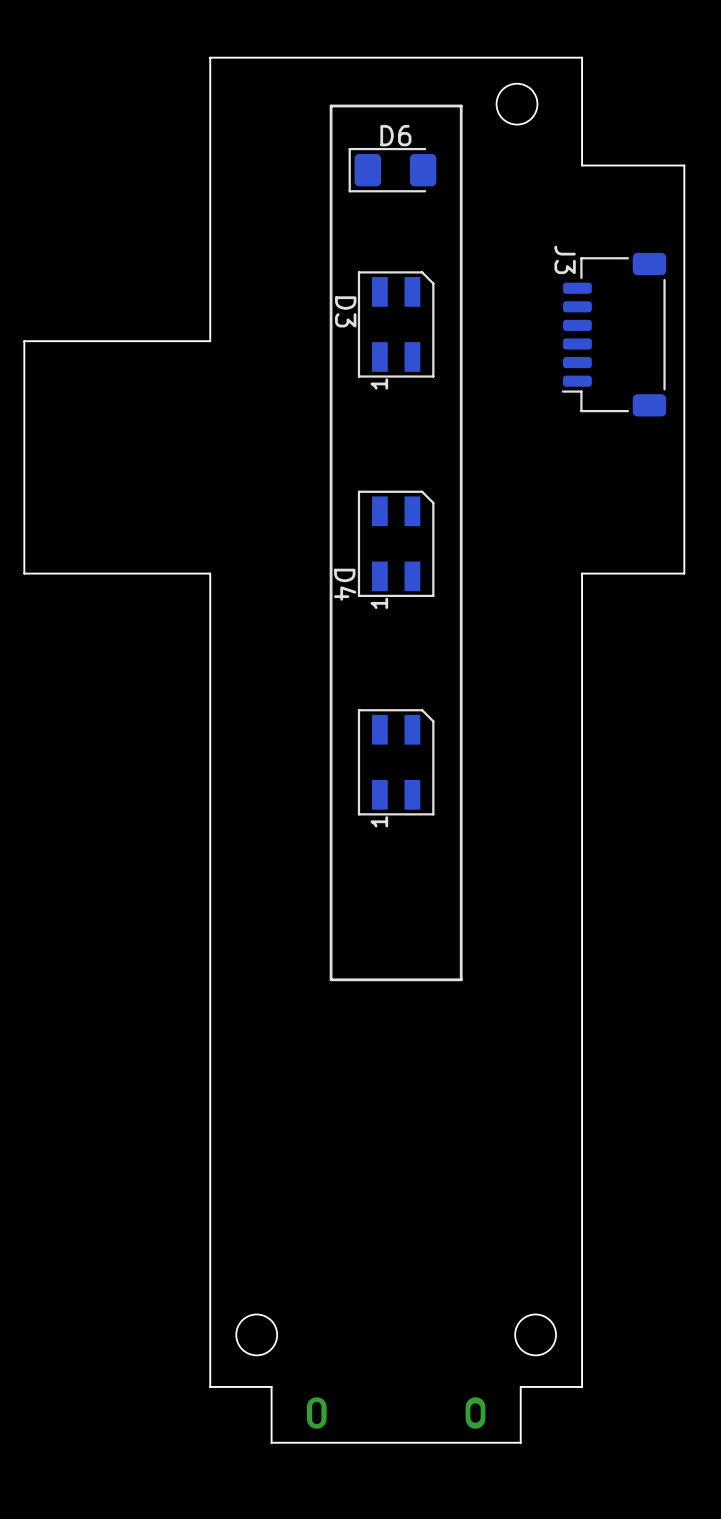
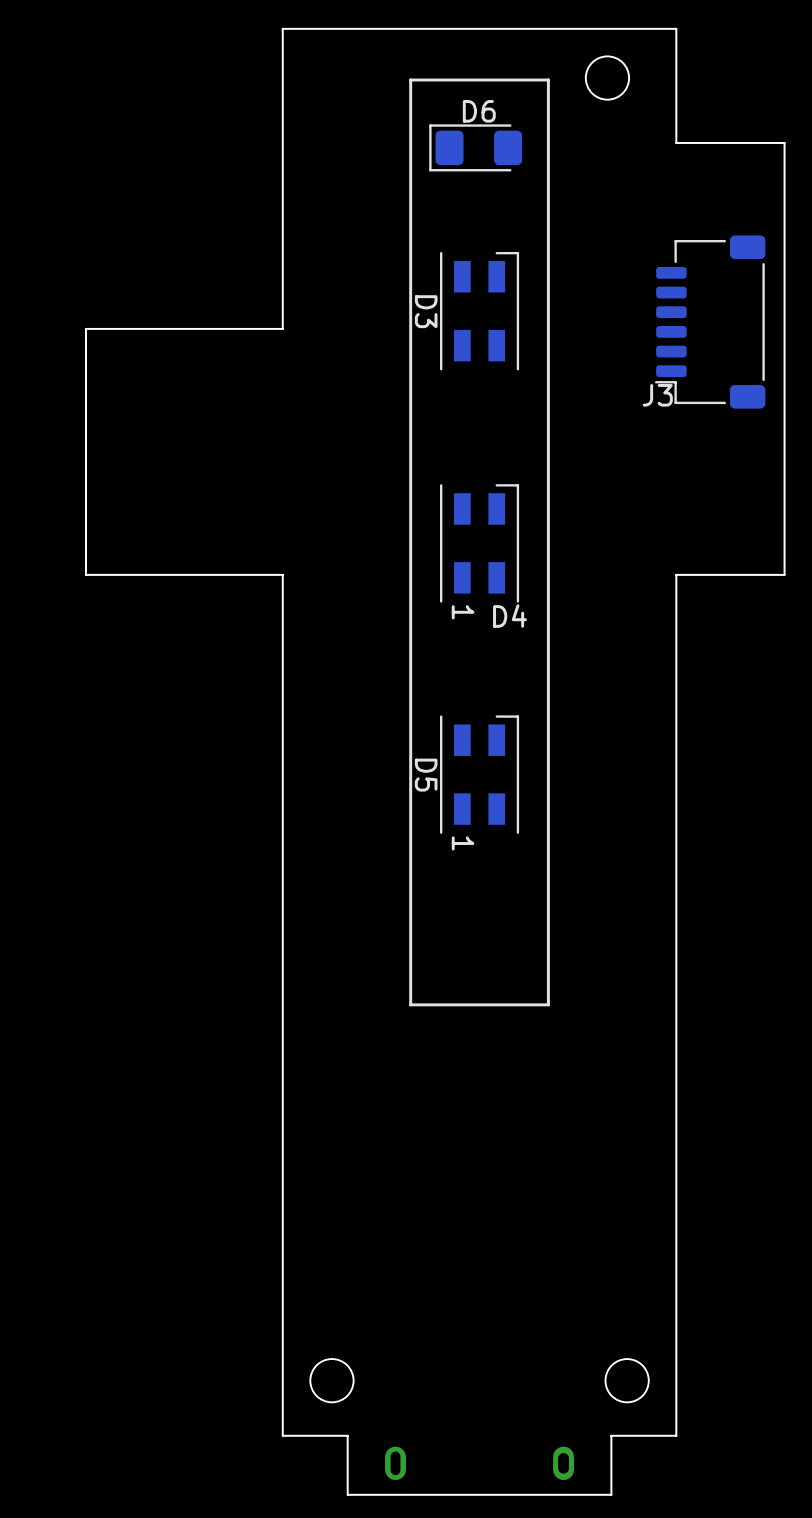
J3 name rotation: 0° (565, 259) -> 90° counterclockwise (657, 395)
J3 name position: J3 (565, 259) -> J3 (657, 395)
D3 footprint: [357, 271, 435, 378] -> [439, 251, 520, 371]
D4 footprint: [357, 490, 435, 598] -> [439, 484, 520, 603]
D4 name position: D4 (345, 584) -> D4 (510, 615)
part: (396, 762) -> none
D5: none -> (479, 774)

